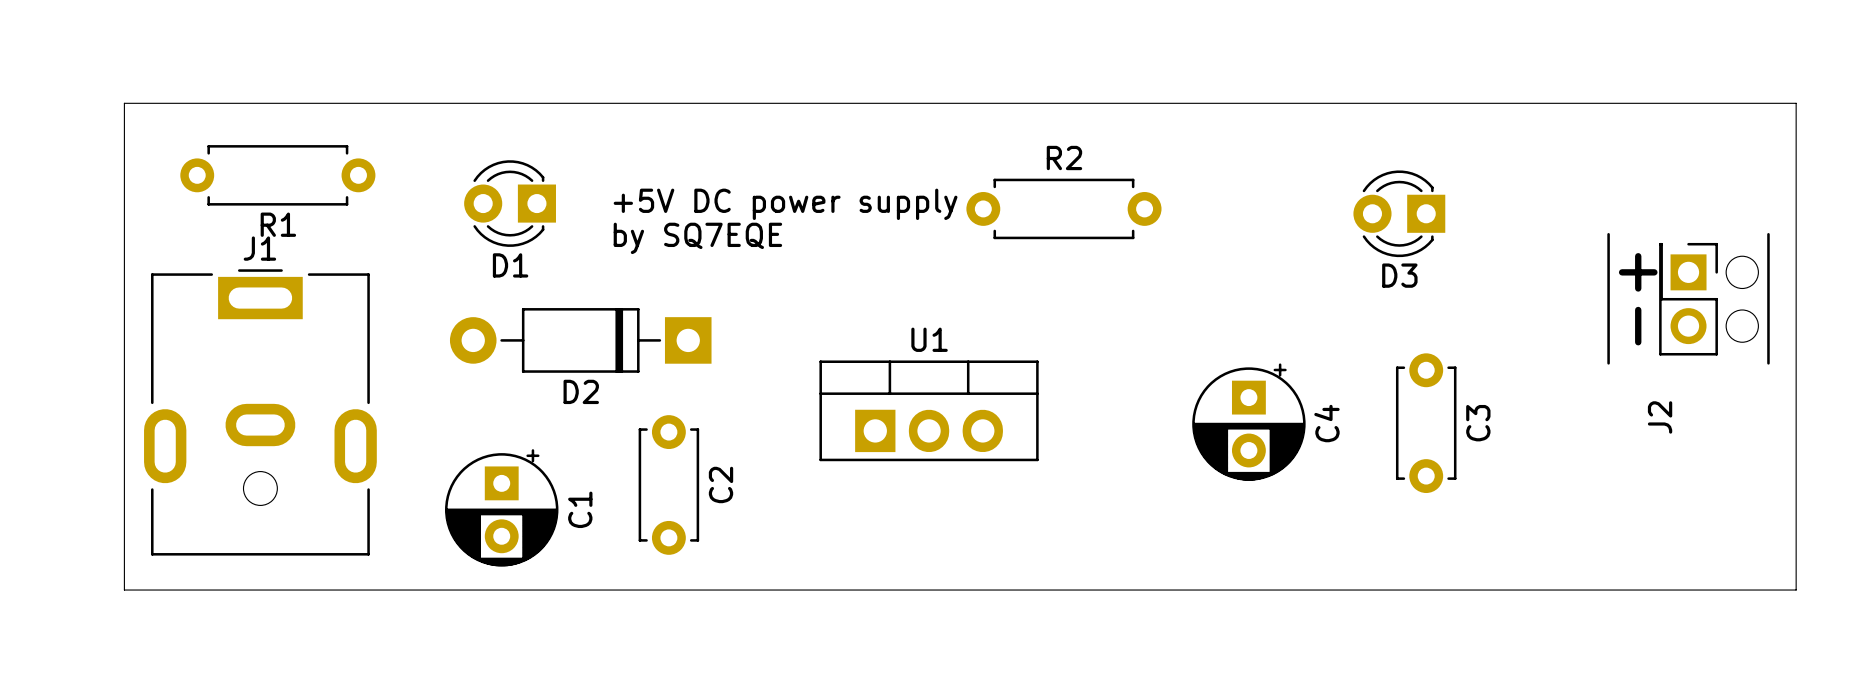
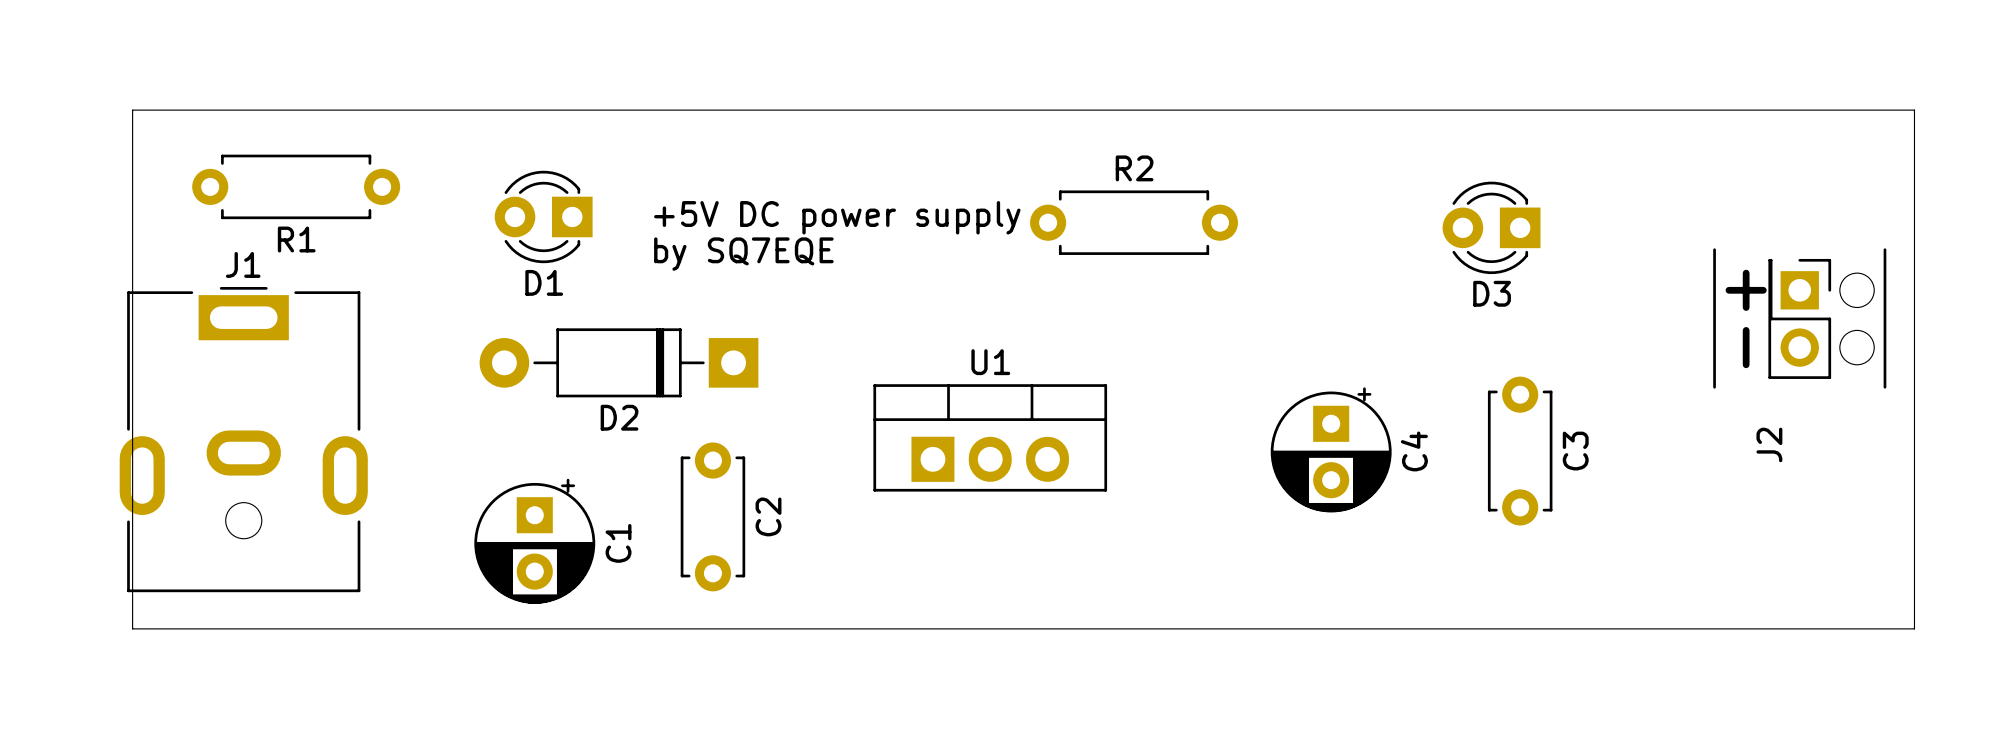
J1 position: (260, 412) -> (243, 439)

